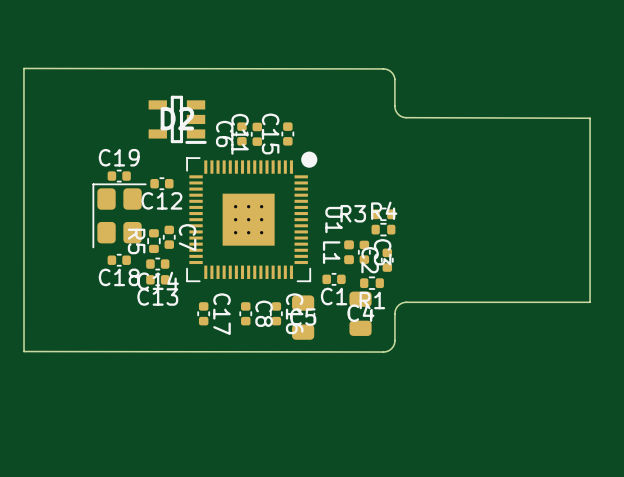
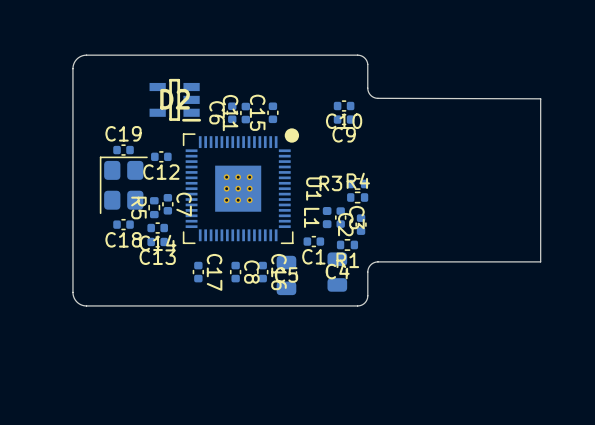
board edge: (23, 68) (24, 351) (383, 352) -> (357, 55) (86, 55) (76, 59) (72, 68) (72, 292) (78, 303) (86, 305) (357, 305)
board edge: (24, 68) (383, 68) -> none
C10: none -> (344, 106)
C9: none -> (344, 119)

